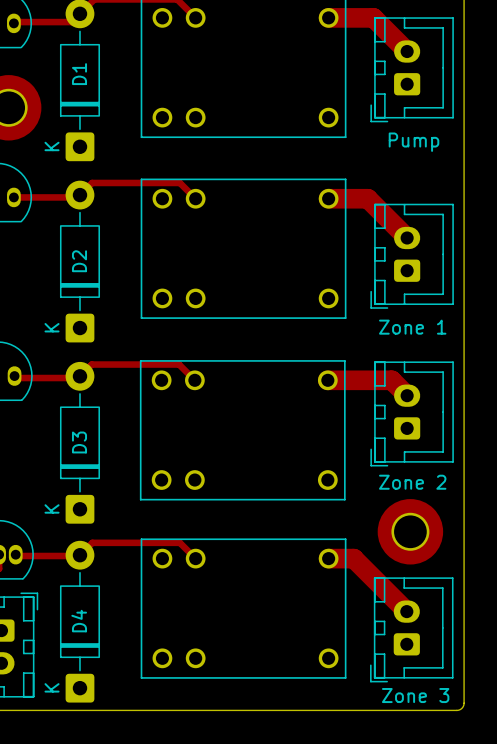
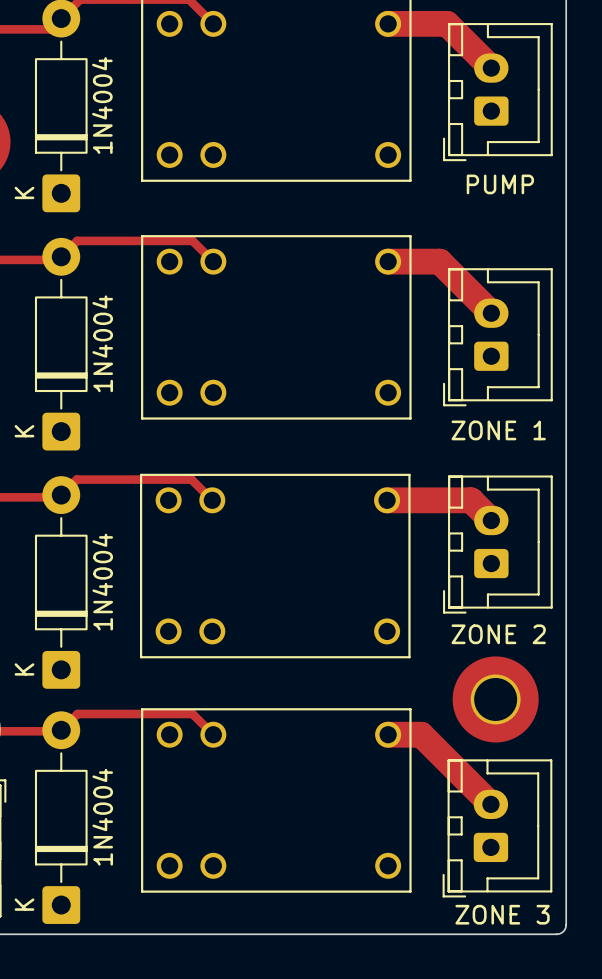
D1 name: D1 (79, 74) -> none
D1 value: none -> 1N4004 (102, 105)
part value: Pump (413, 142) -> PUMP (500, 184)
D2 name: D2 (79, 261) -> none
D2 value: none -> 1N4004 (102, 343)
part value: Zone 1 (412, 327) -> ZONE 1 (498, 430)
D3 name: D3 (79, 442) -> none
D3 value: none -> 1N4004 (102, 582)
part value: Zone 2 (412, 482) -> ZONE 2 (498, 634)
D4 name: D4 (79, 621) -> none
D4 value: none -> 1N4004 (102, 817)
part value: Zone 3 (415, 695) -> ZONE 3 (502, 914)

